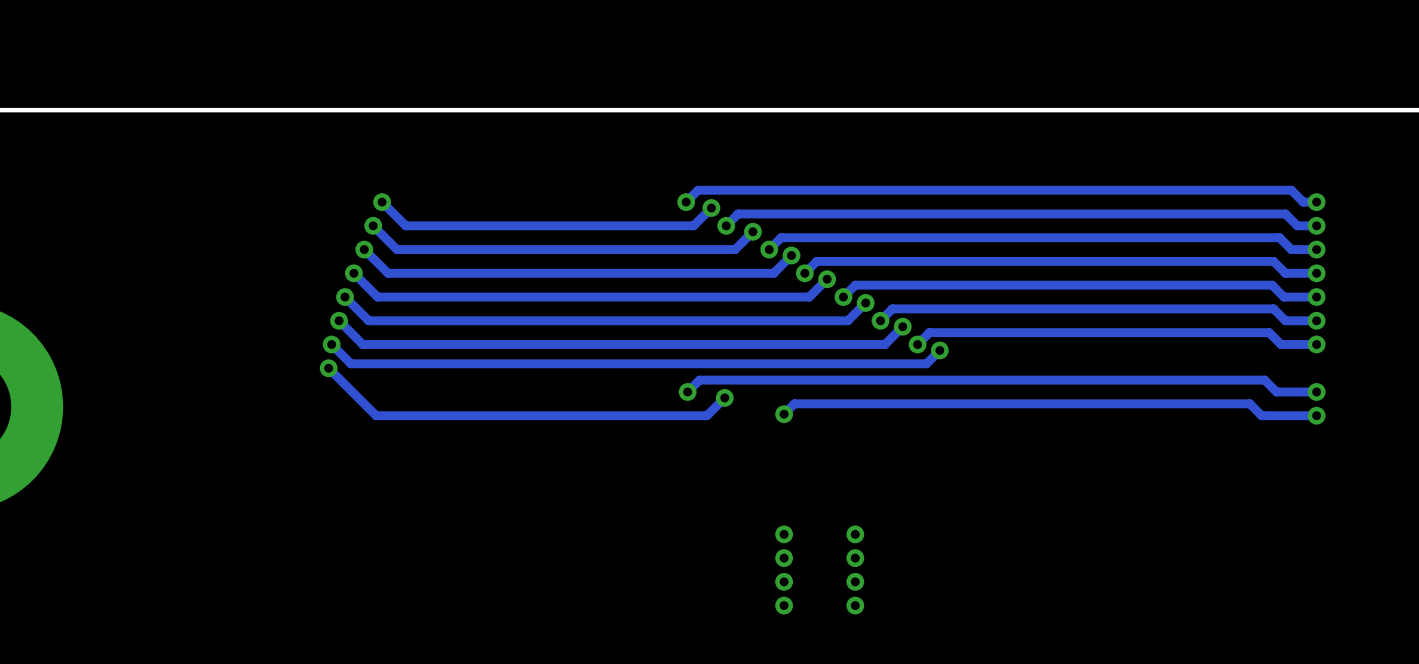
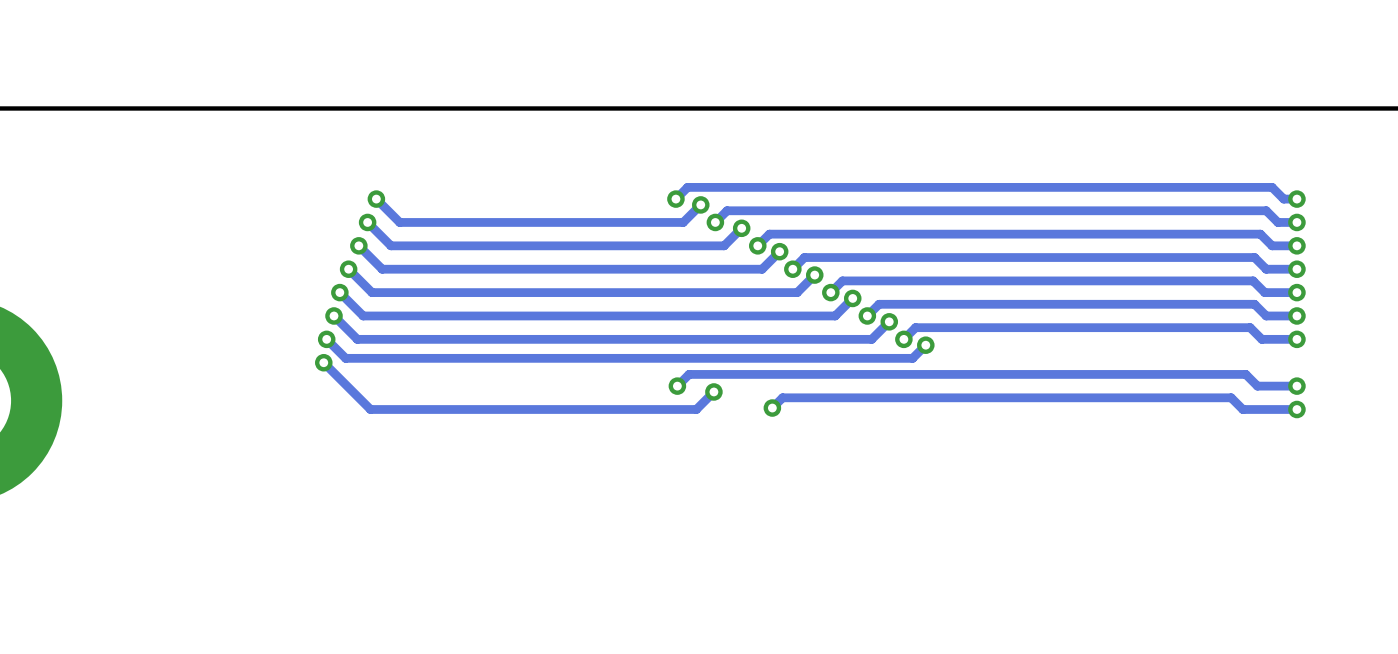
via: (784, 534) -> none
via: (855, 534) -> none
via: (784, 558) -> none
via: (855, 558) -> none
via: (784, 581) -> none
via: (855, 581) -> none
via: (784, 605) -> none
via: (855, 605) -> none

